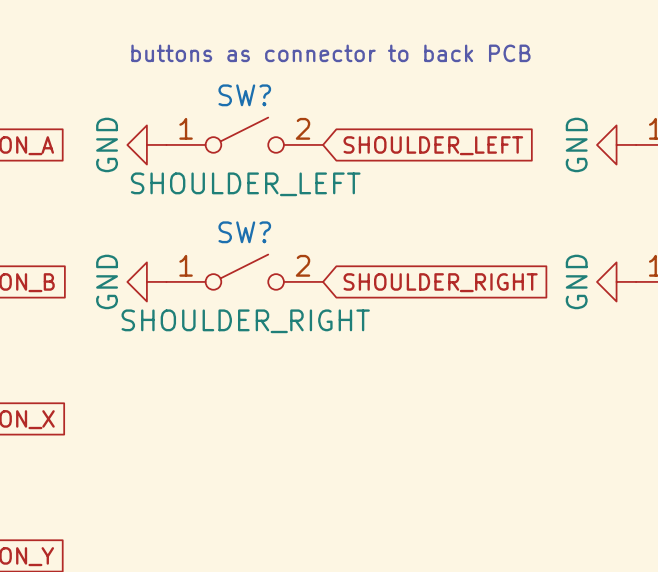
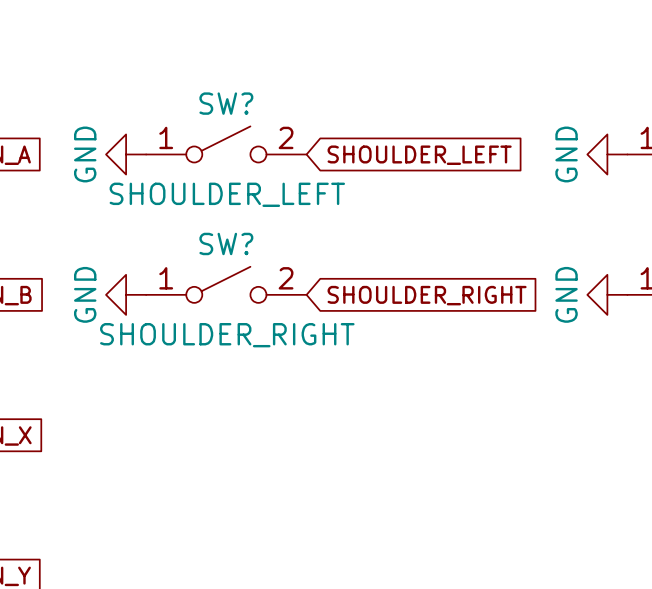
text: buttons as connector to back PCB (330, 53) -> none

